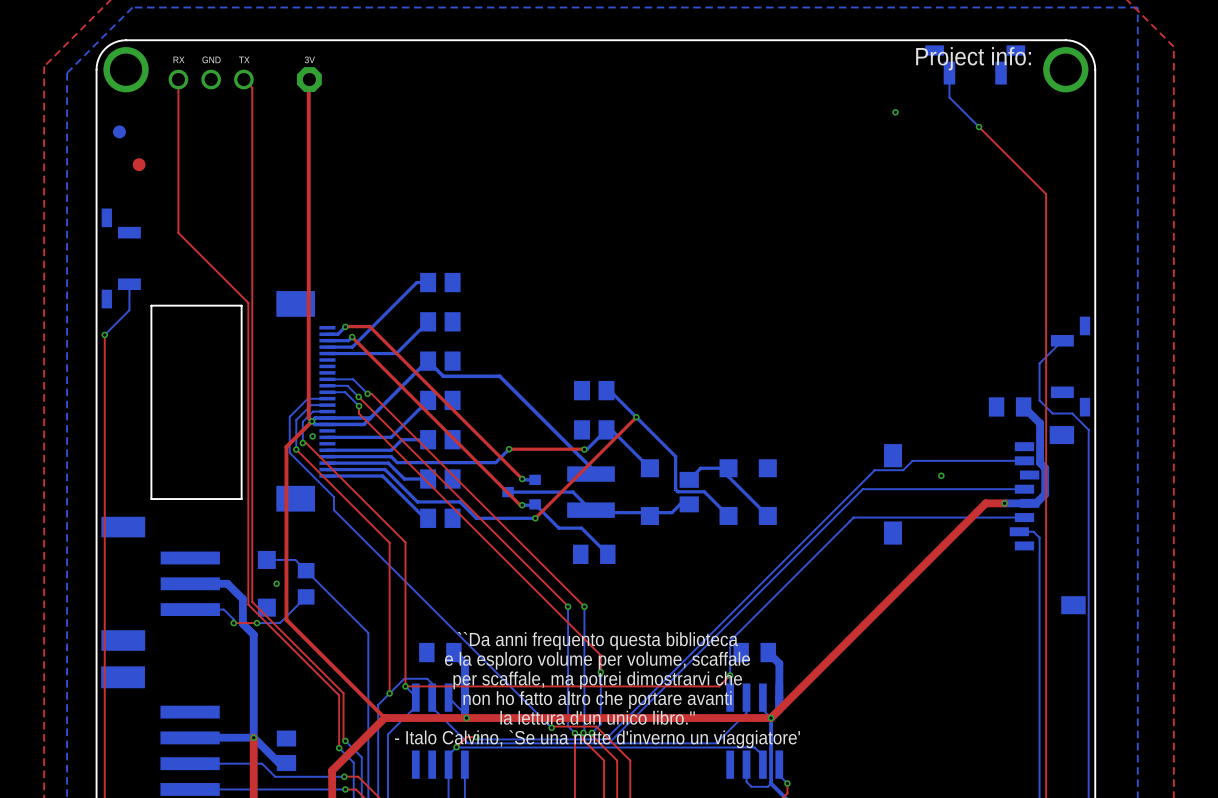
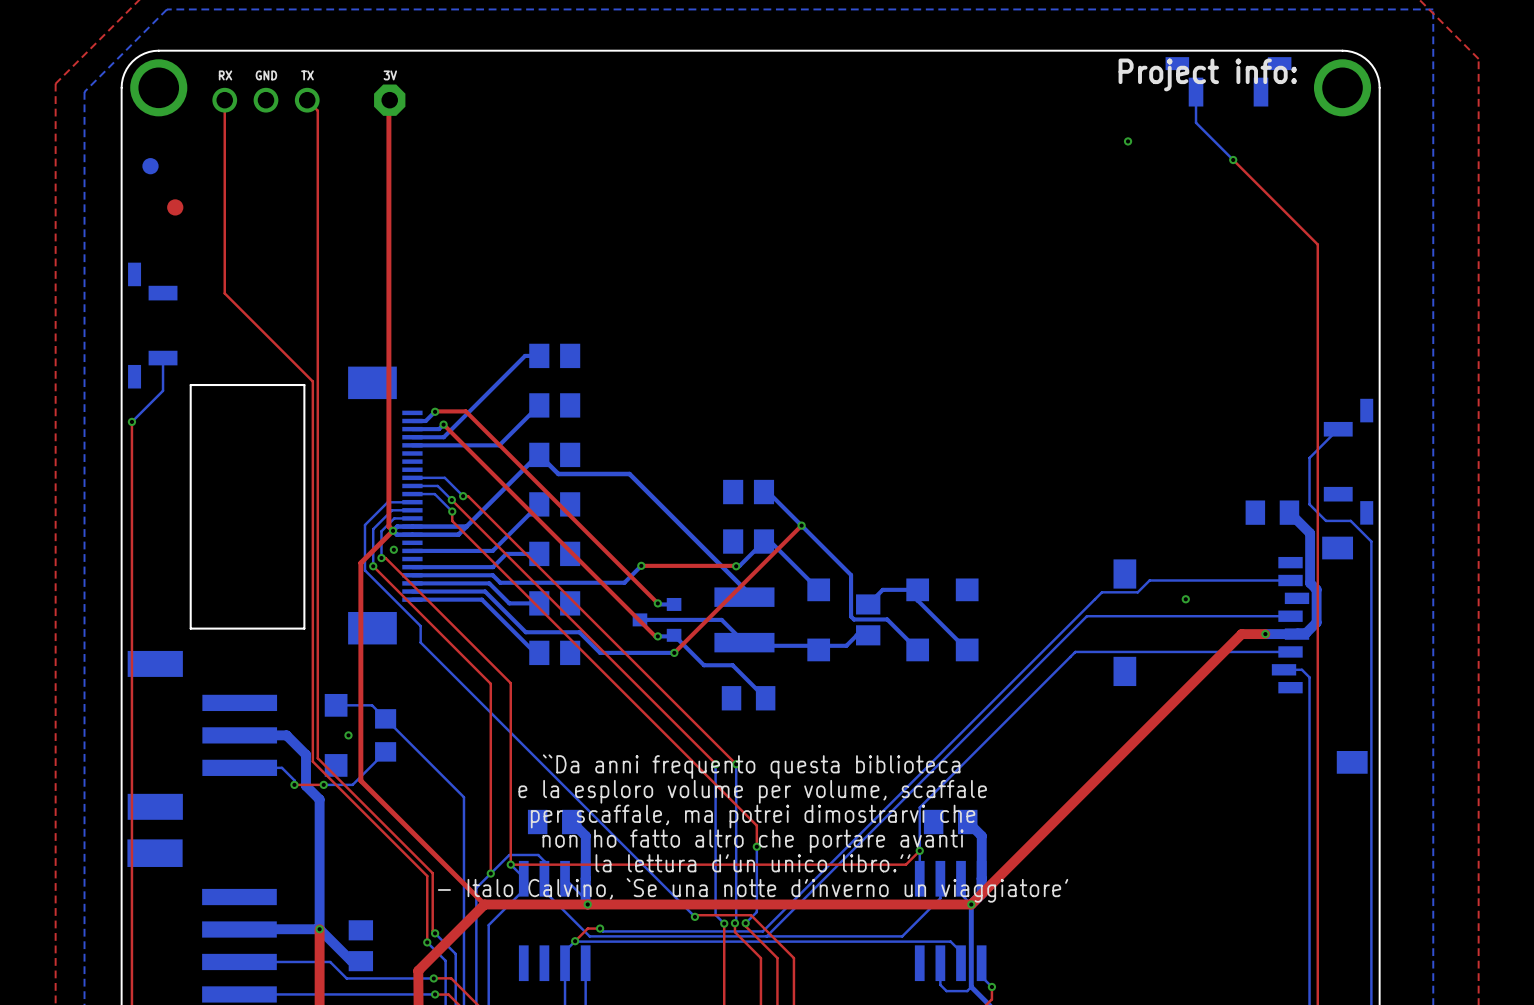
text position: ``Da anni frequento questa biblioteca (597, 640) -> ``Da anni frequento questa biblioteca (751, 766)
text position: e la esploro volume per volume, scaffale (597, 660) -> e la esploro volume per volume, scaffale (752, 791)
text position: per scaffale, ma potrei dimostrarvi che (597, 680) -> per scaffale, ma potrei dimostrarvi che (753, 816)
text position: non ho fatto altro che portare avanti (597, 700) -> non ho fatto altro che portare avanti (753, 841)
text position: la lettura d'un unico libro.'' (597, 717) -> la lettura d'un unico libro.'' (753, 863)
text position: - Italo Calvino, `Se una notte d'inverno un viaggiatore' (597, 739) -> - Italo Calvino, `Se una notte d'inverno un viaggiatore' (753, 890)

